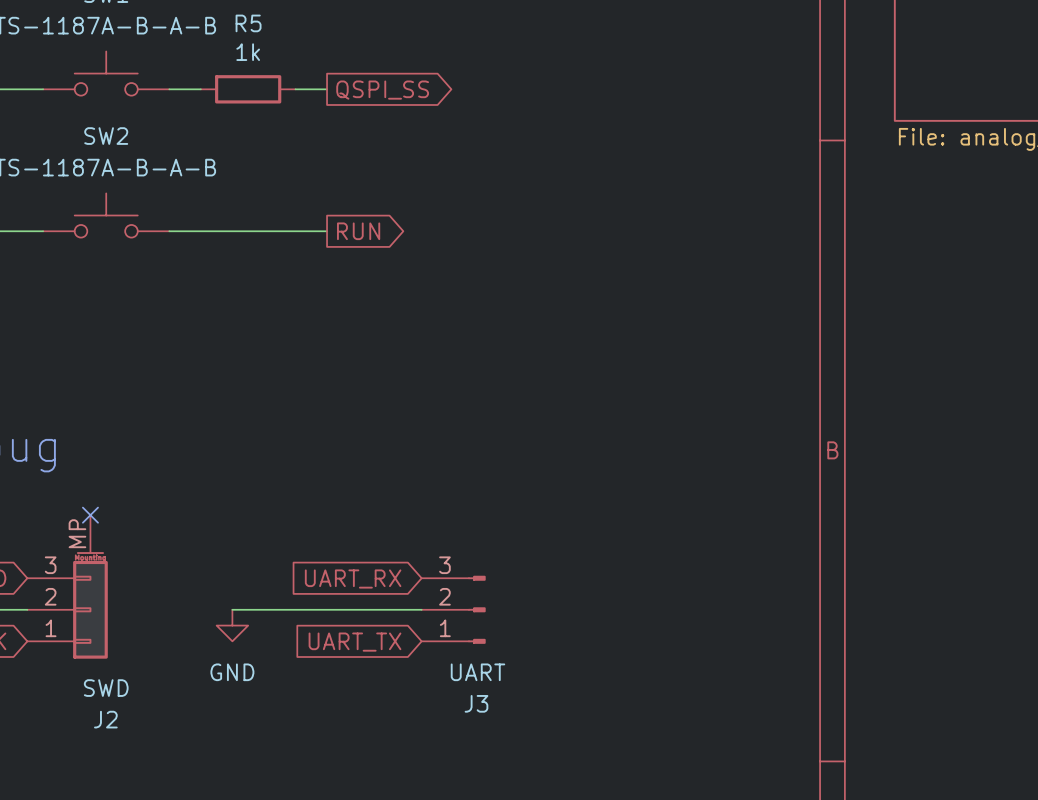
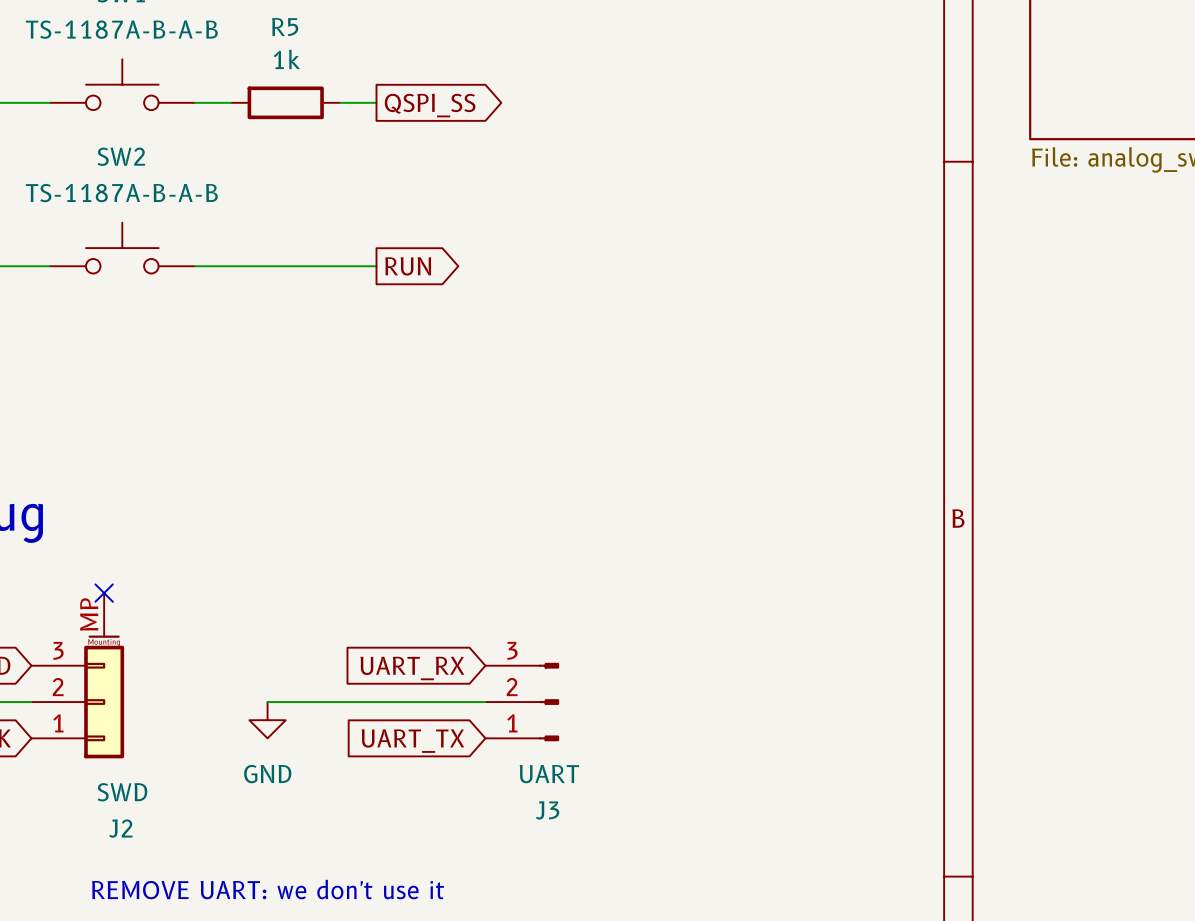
text: none -> REMOVE UART: we don't use it (268, 889)

